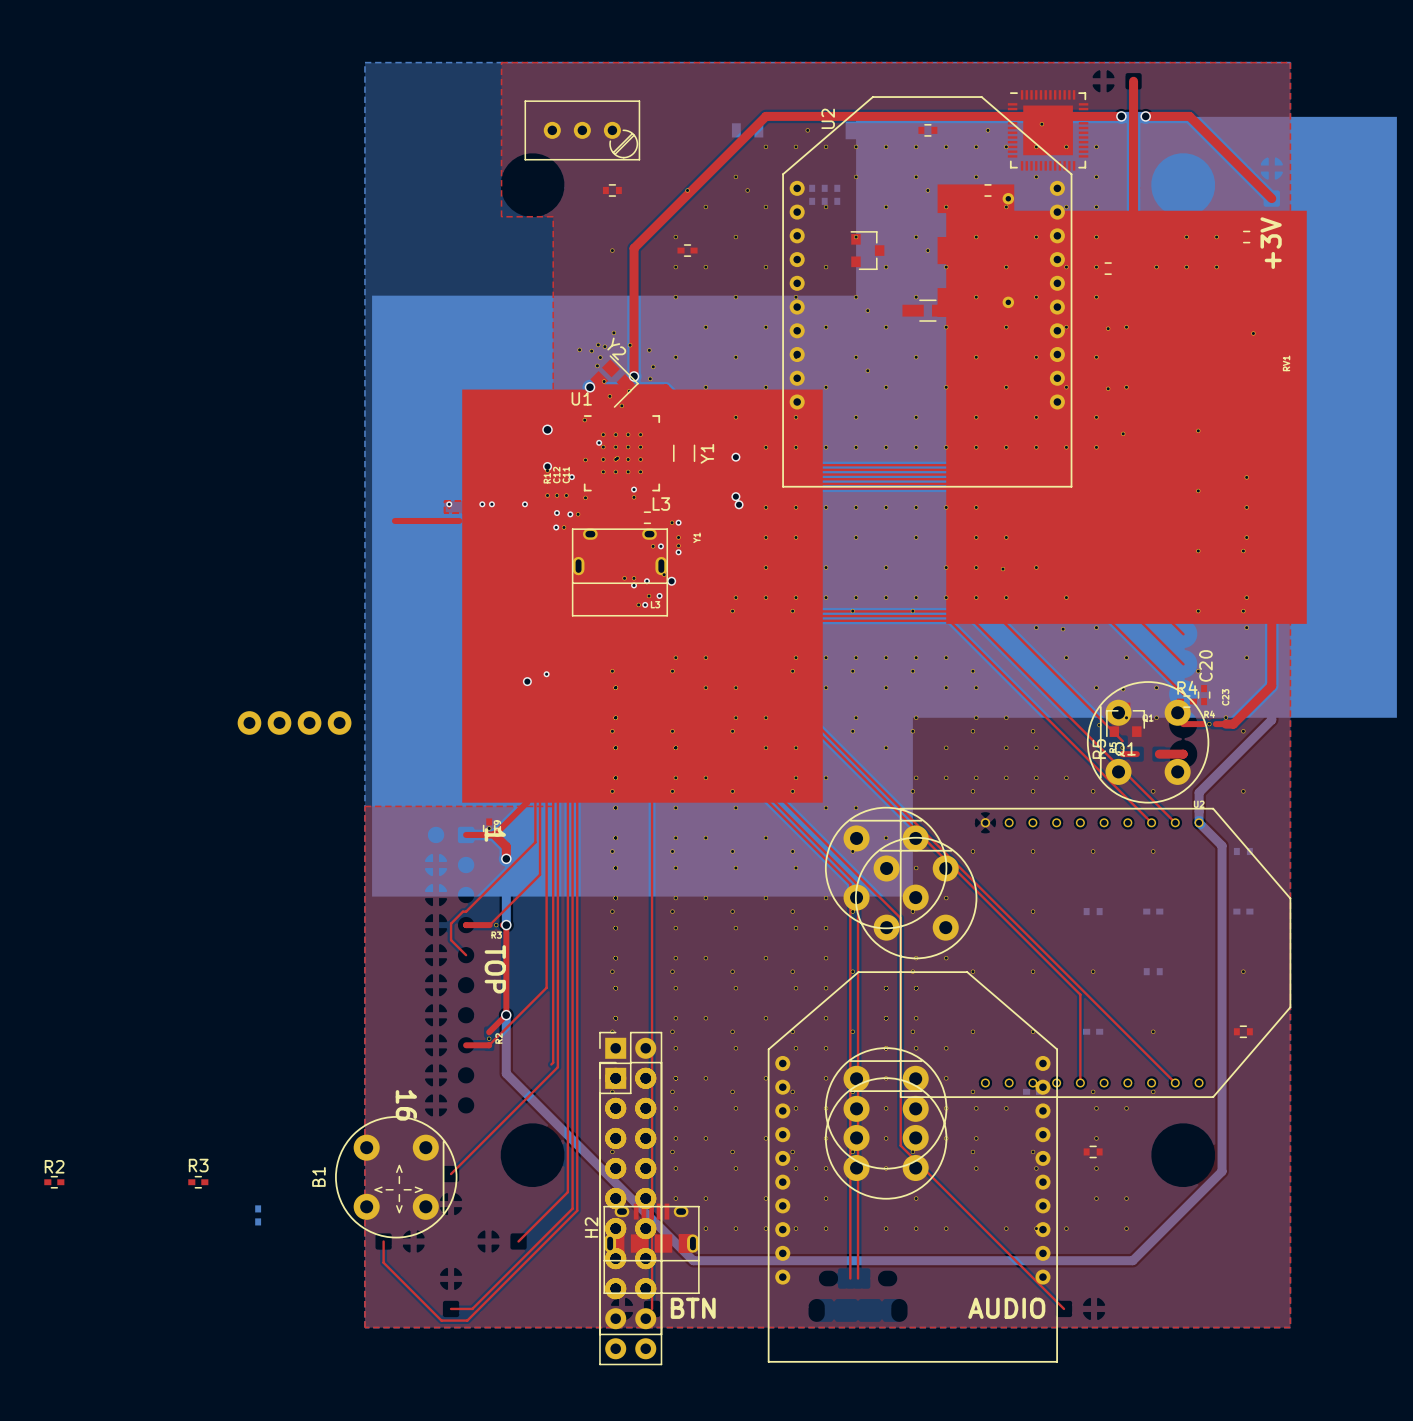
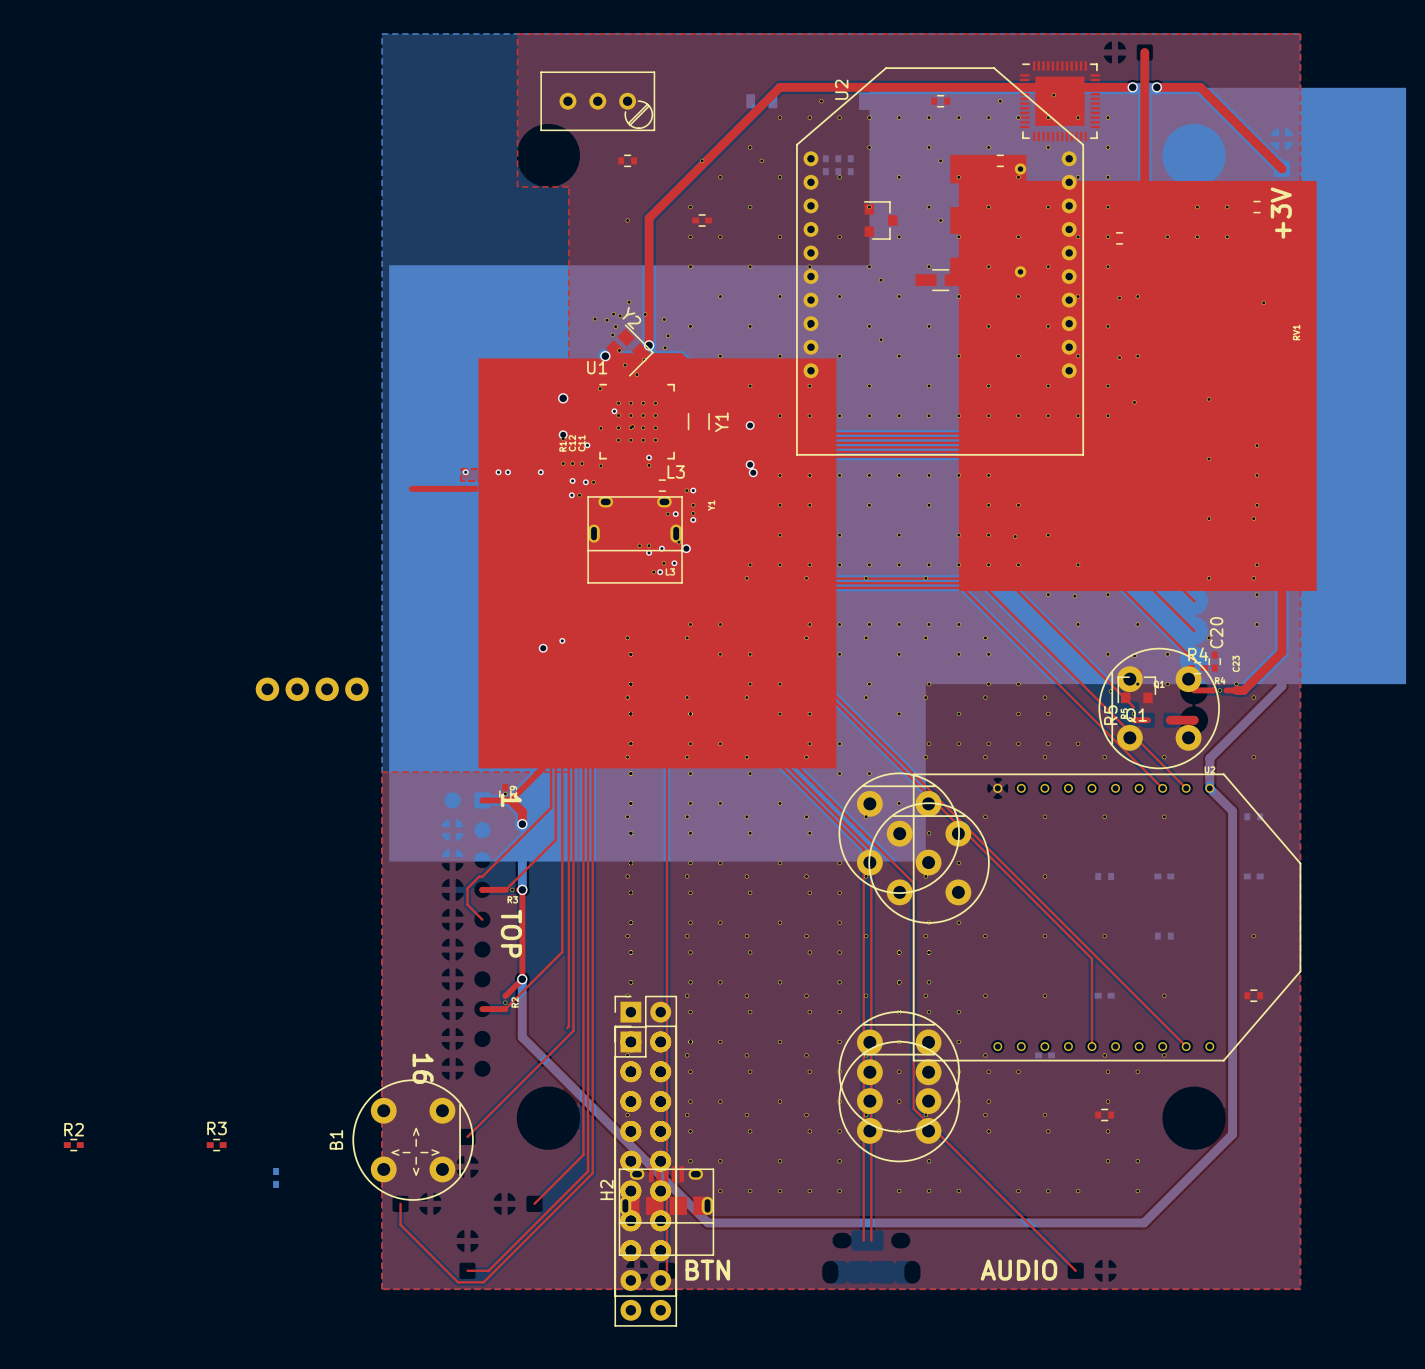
part: (912, 1166) -> none

